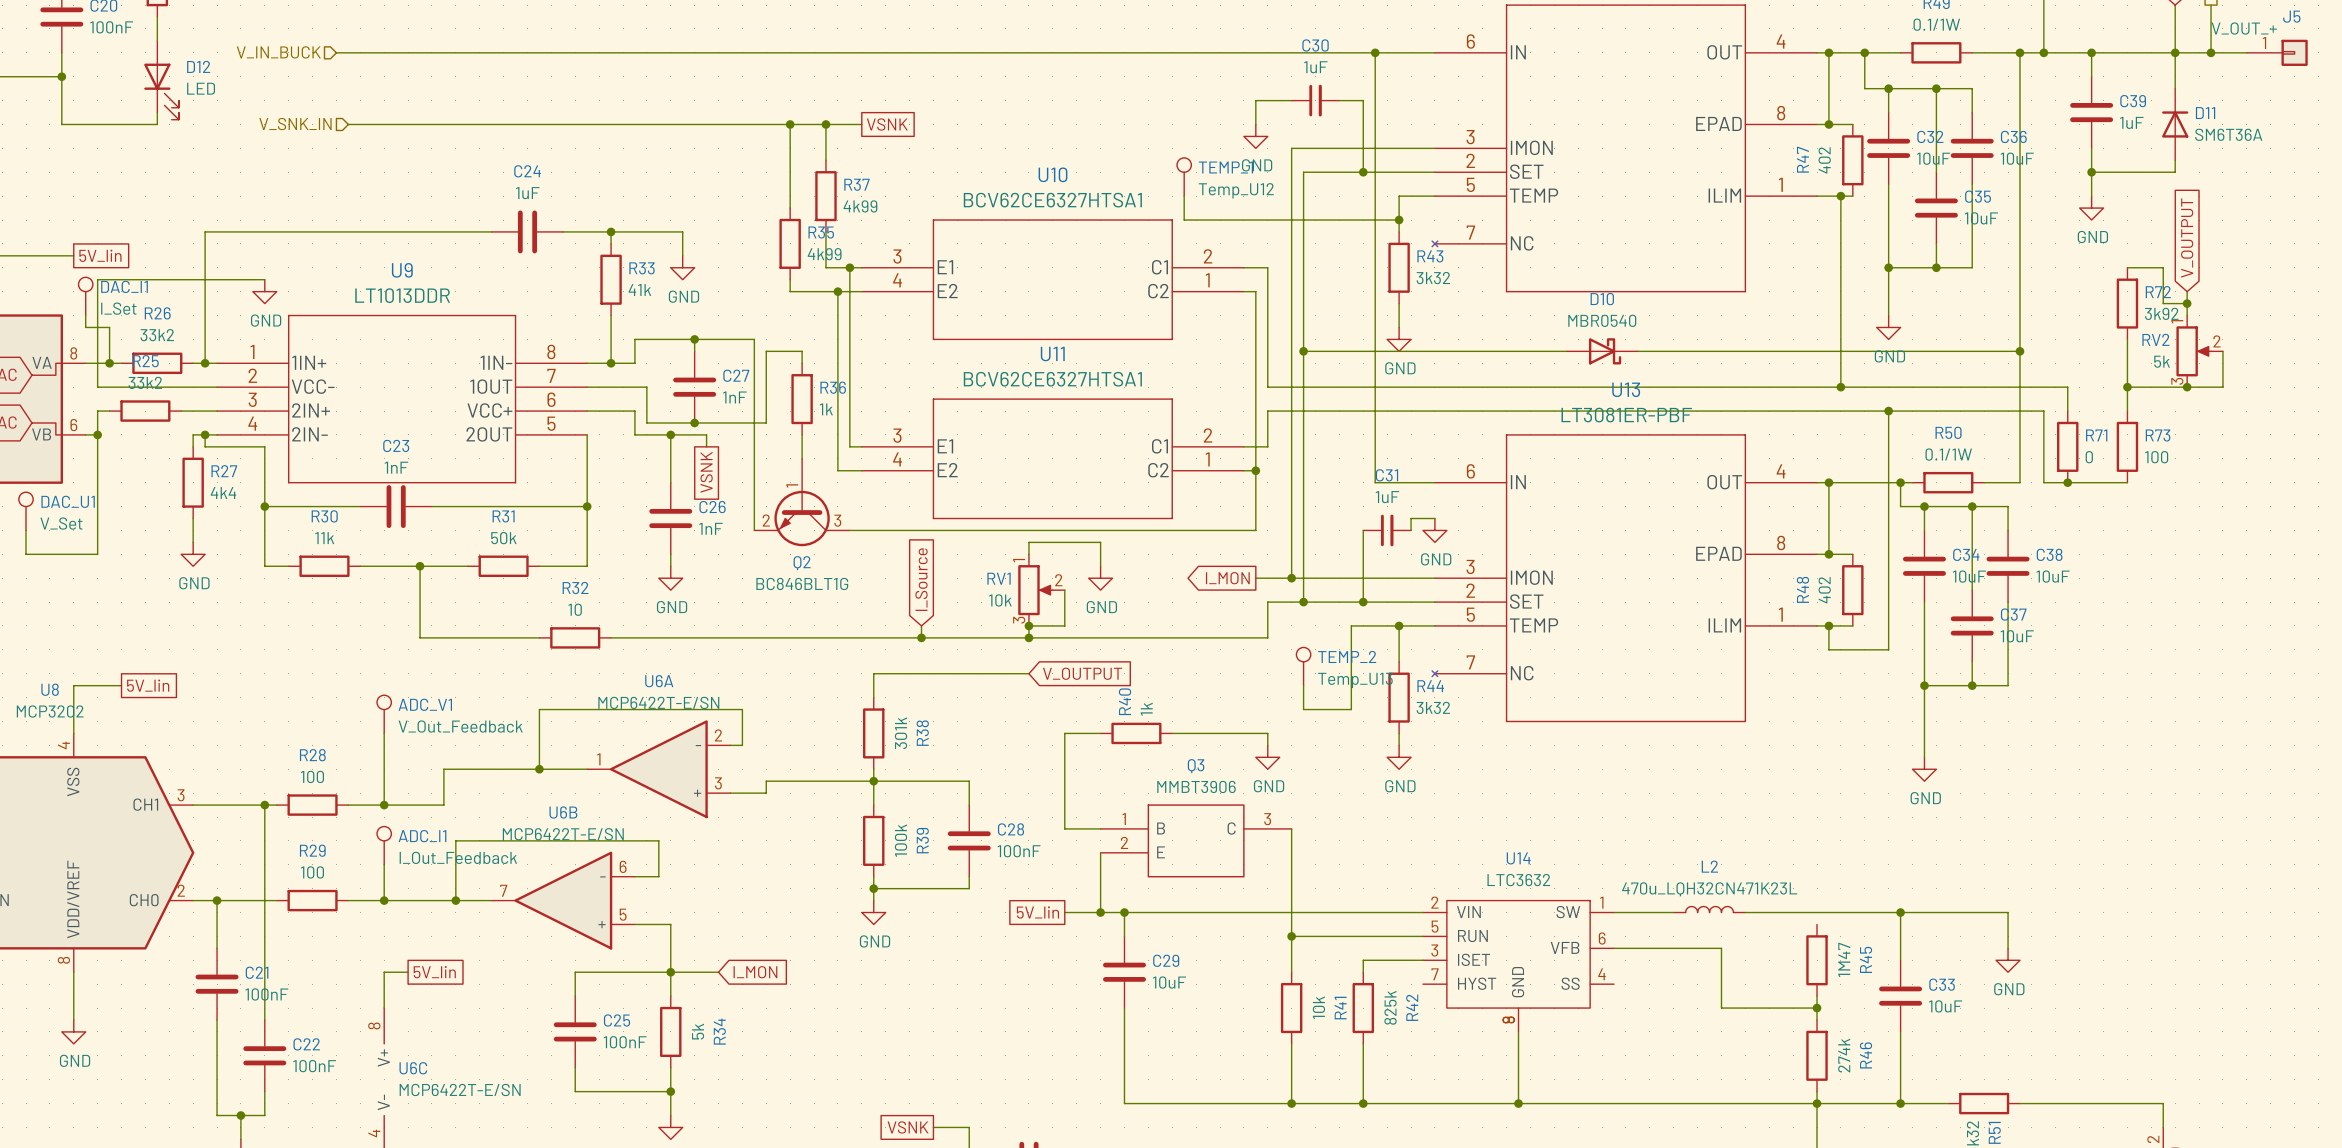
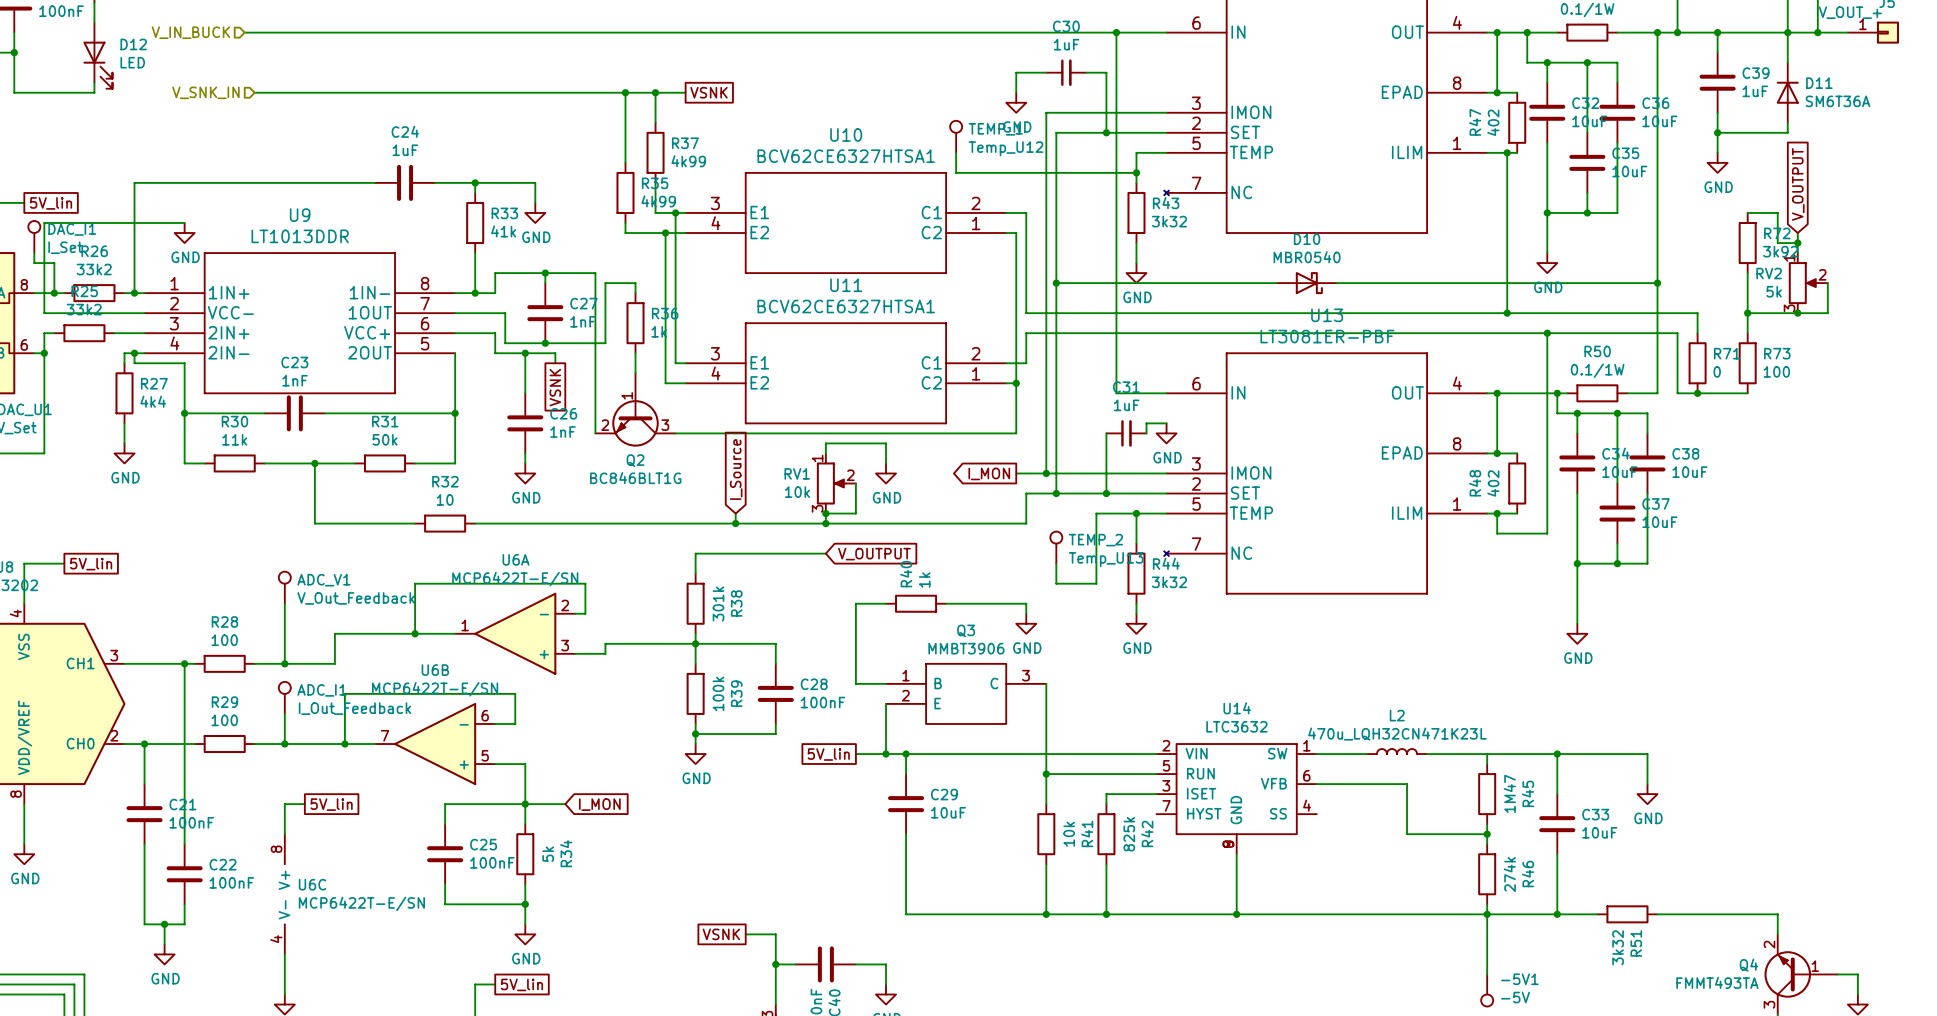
wire: none -> (1487, 754) (1487, 764)

